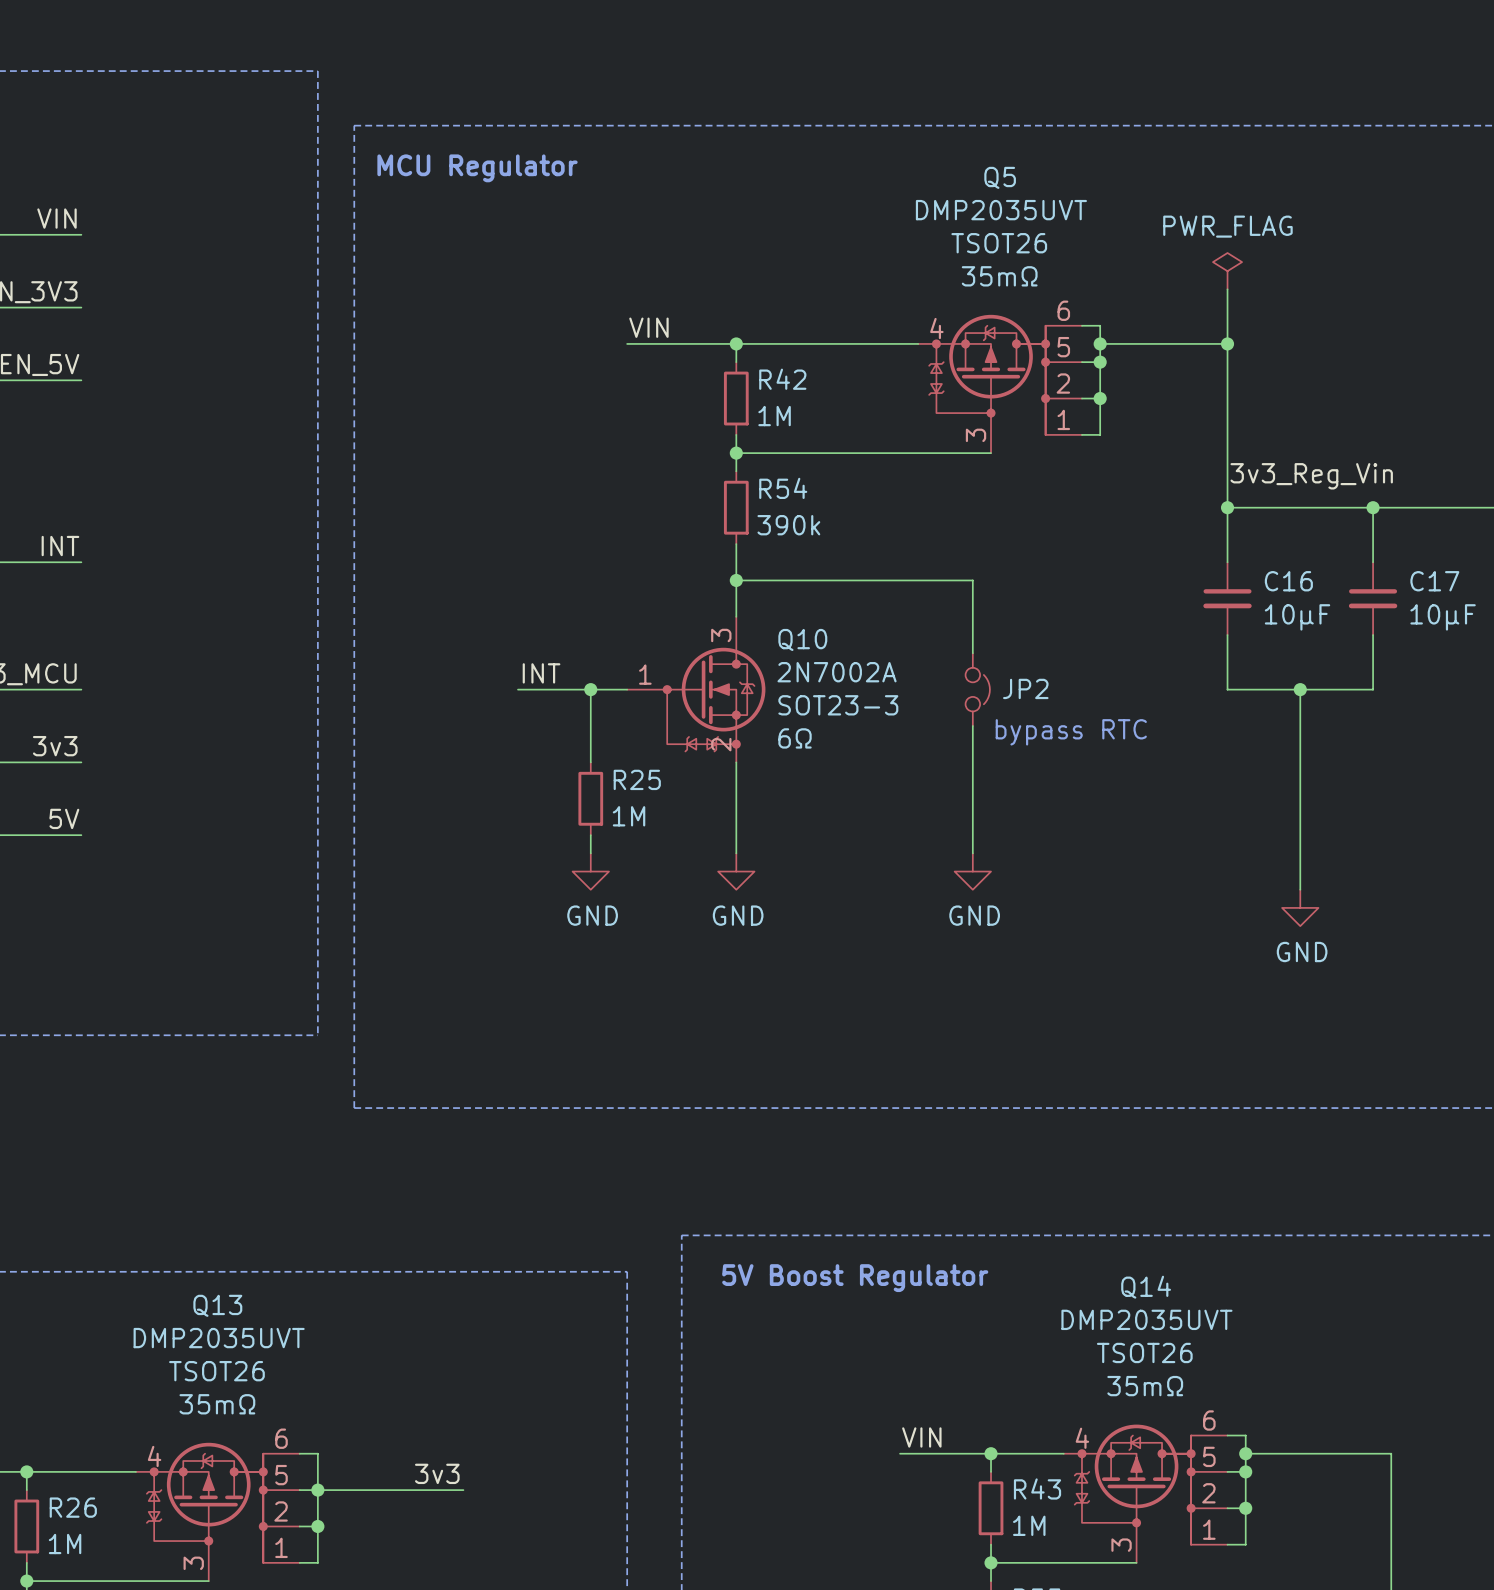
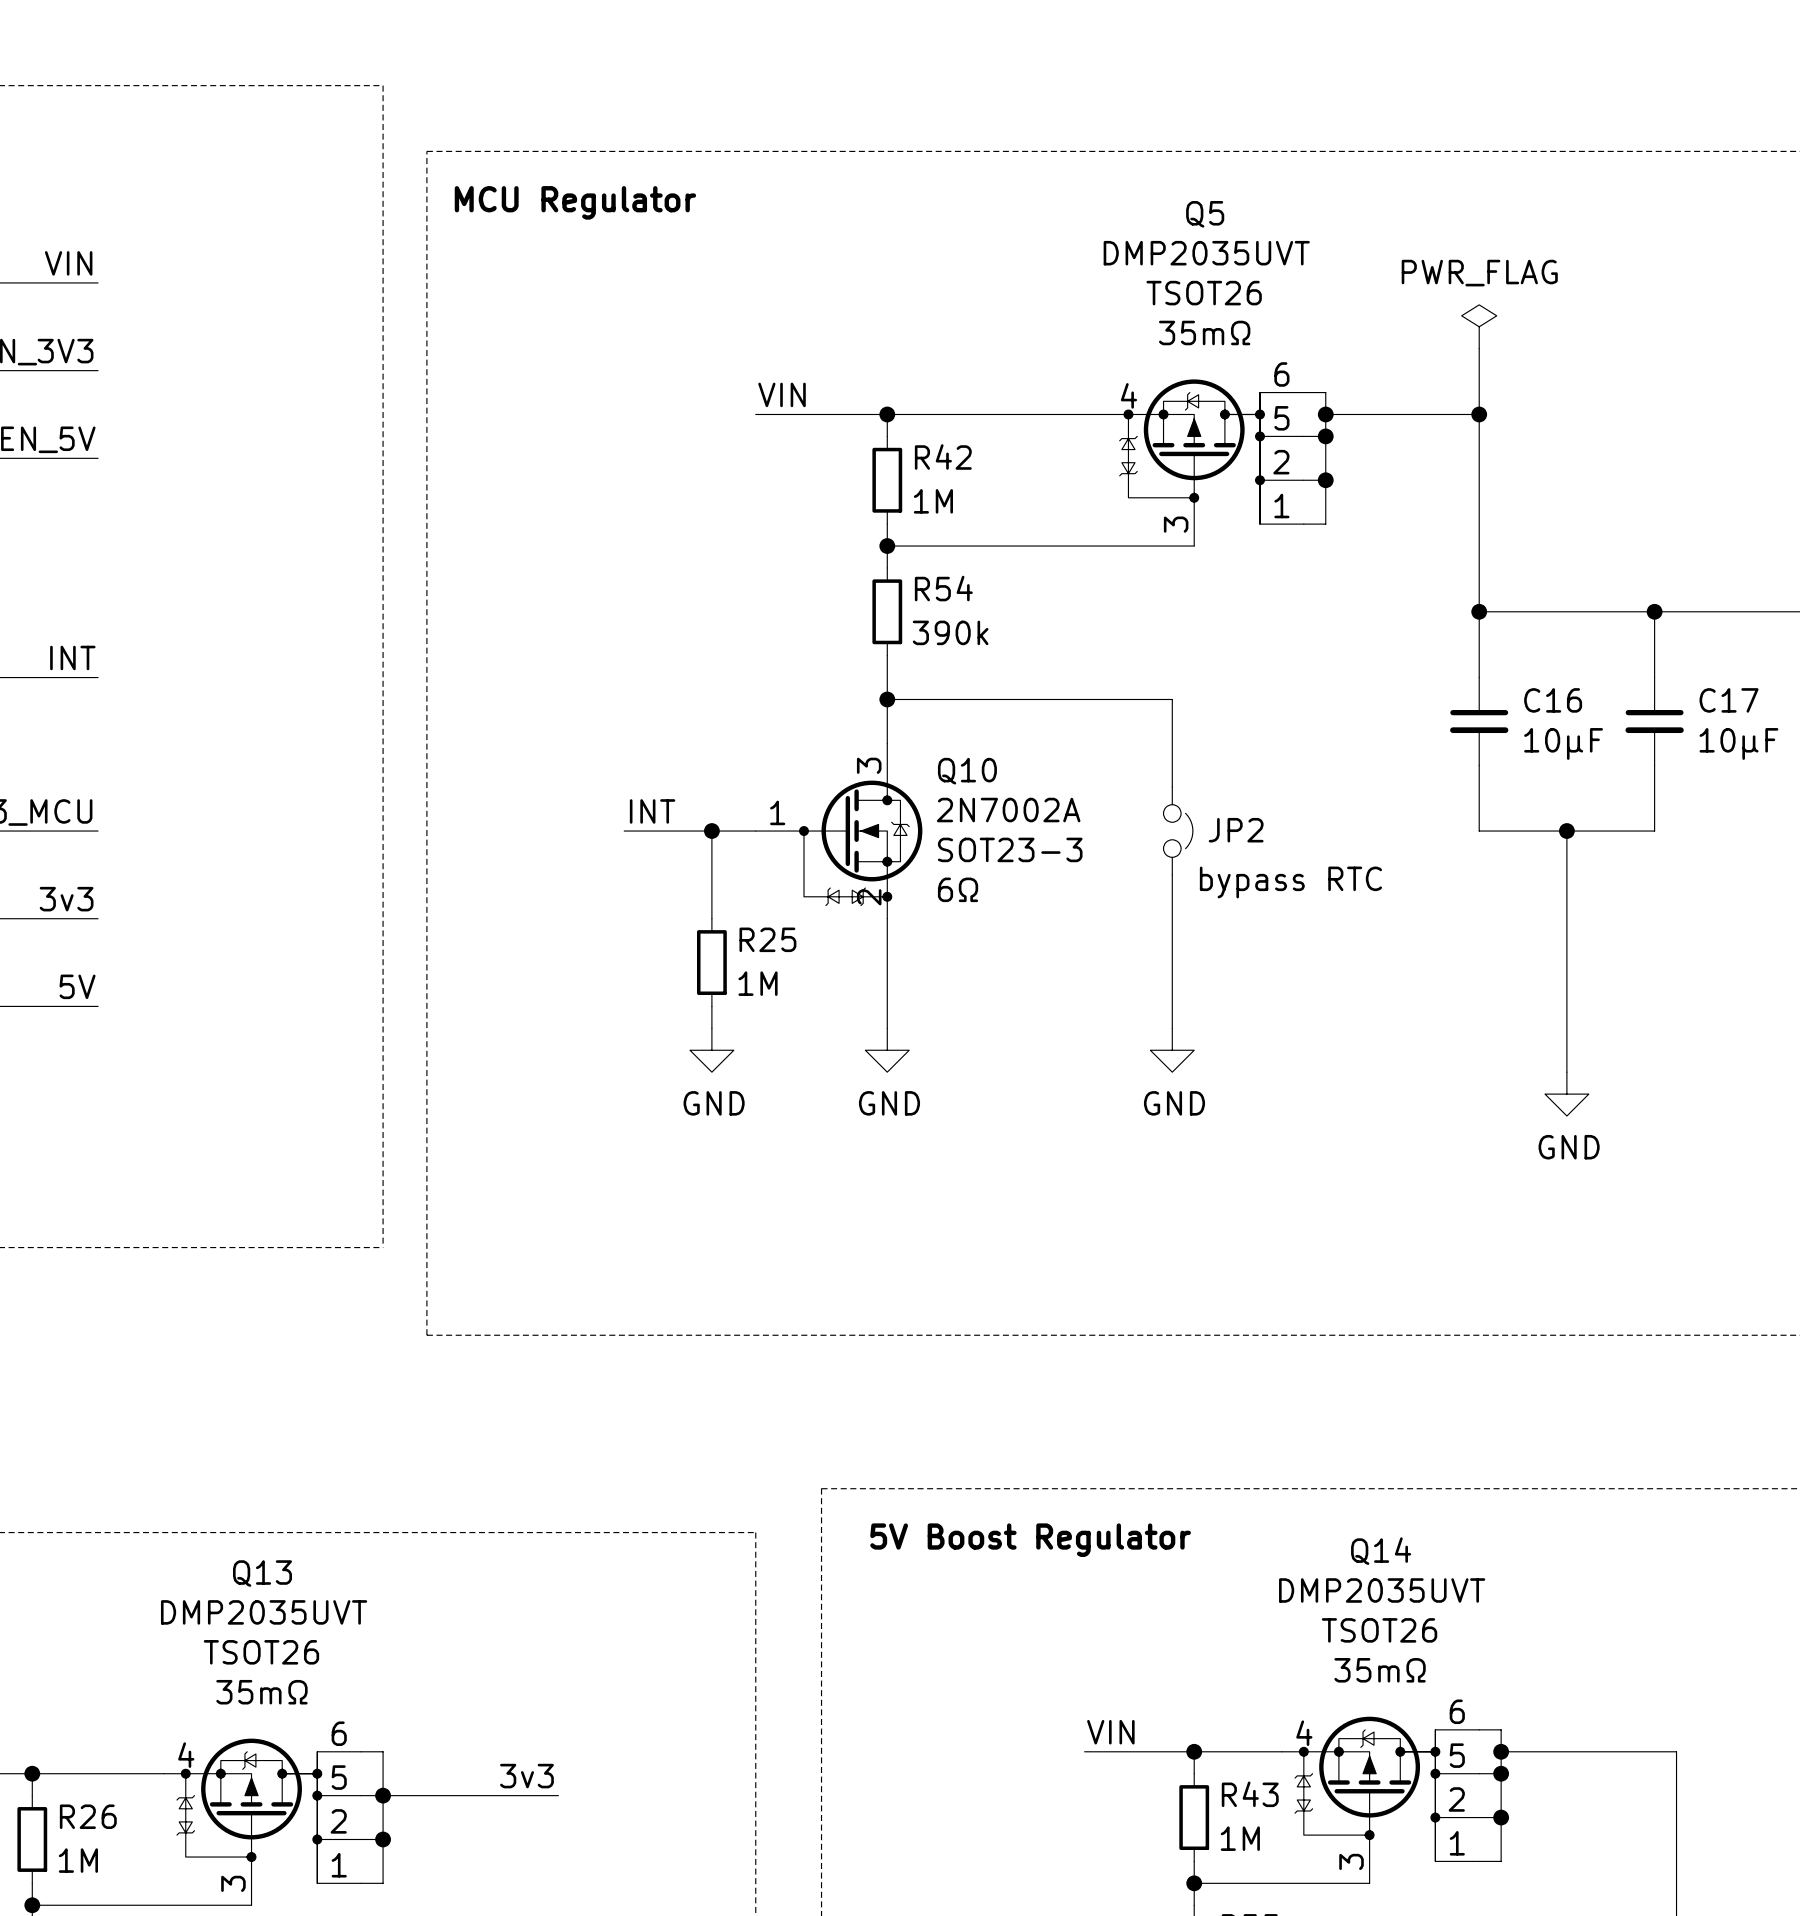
label: 3v3_Reg_Vin (1311, 476) -> none

